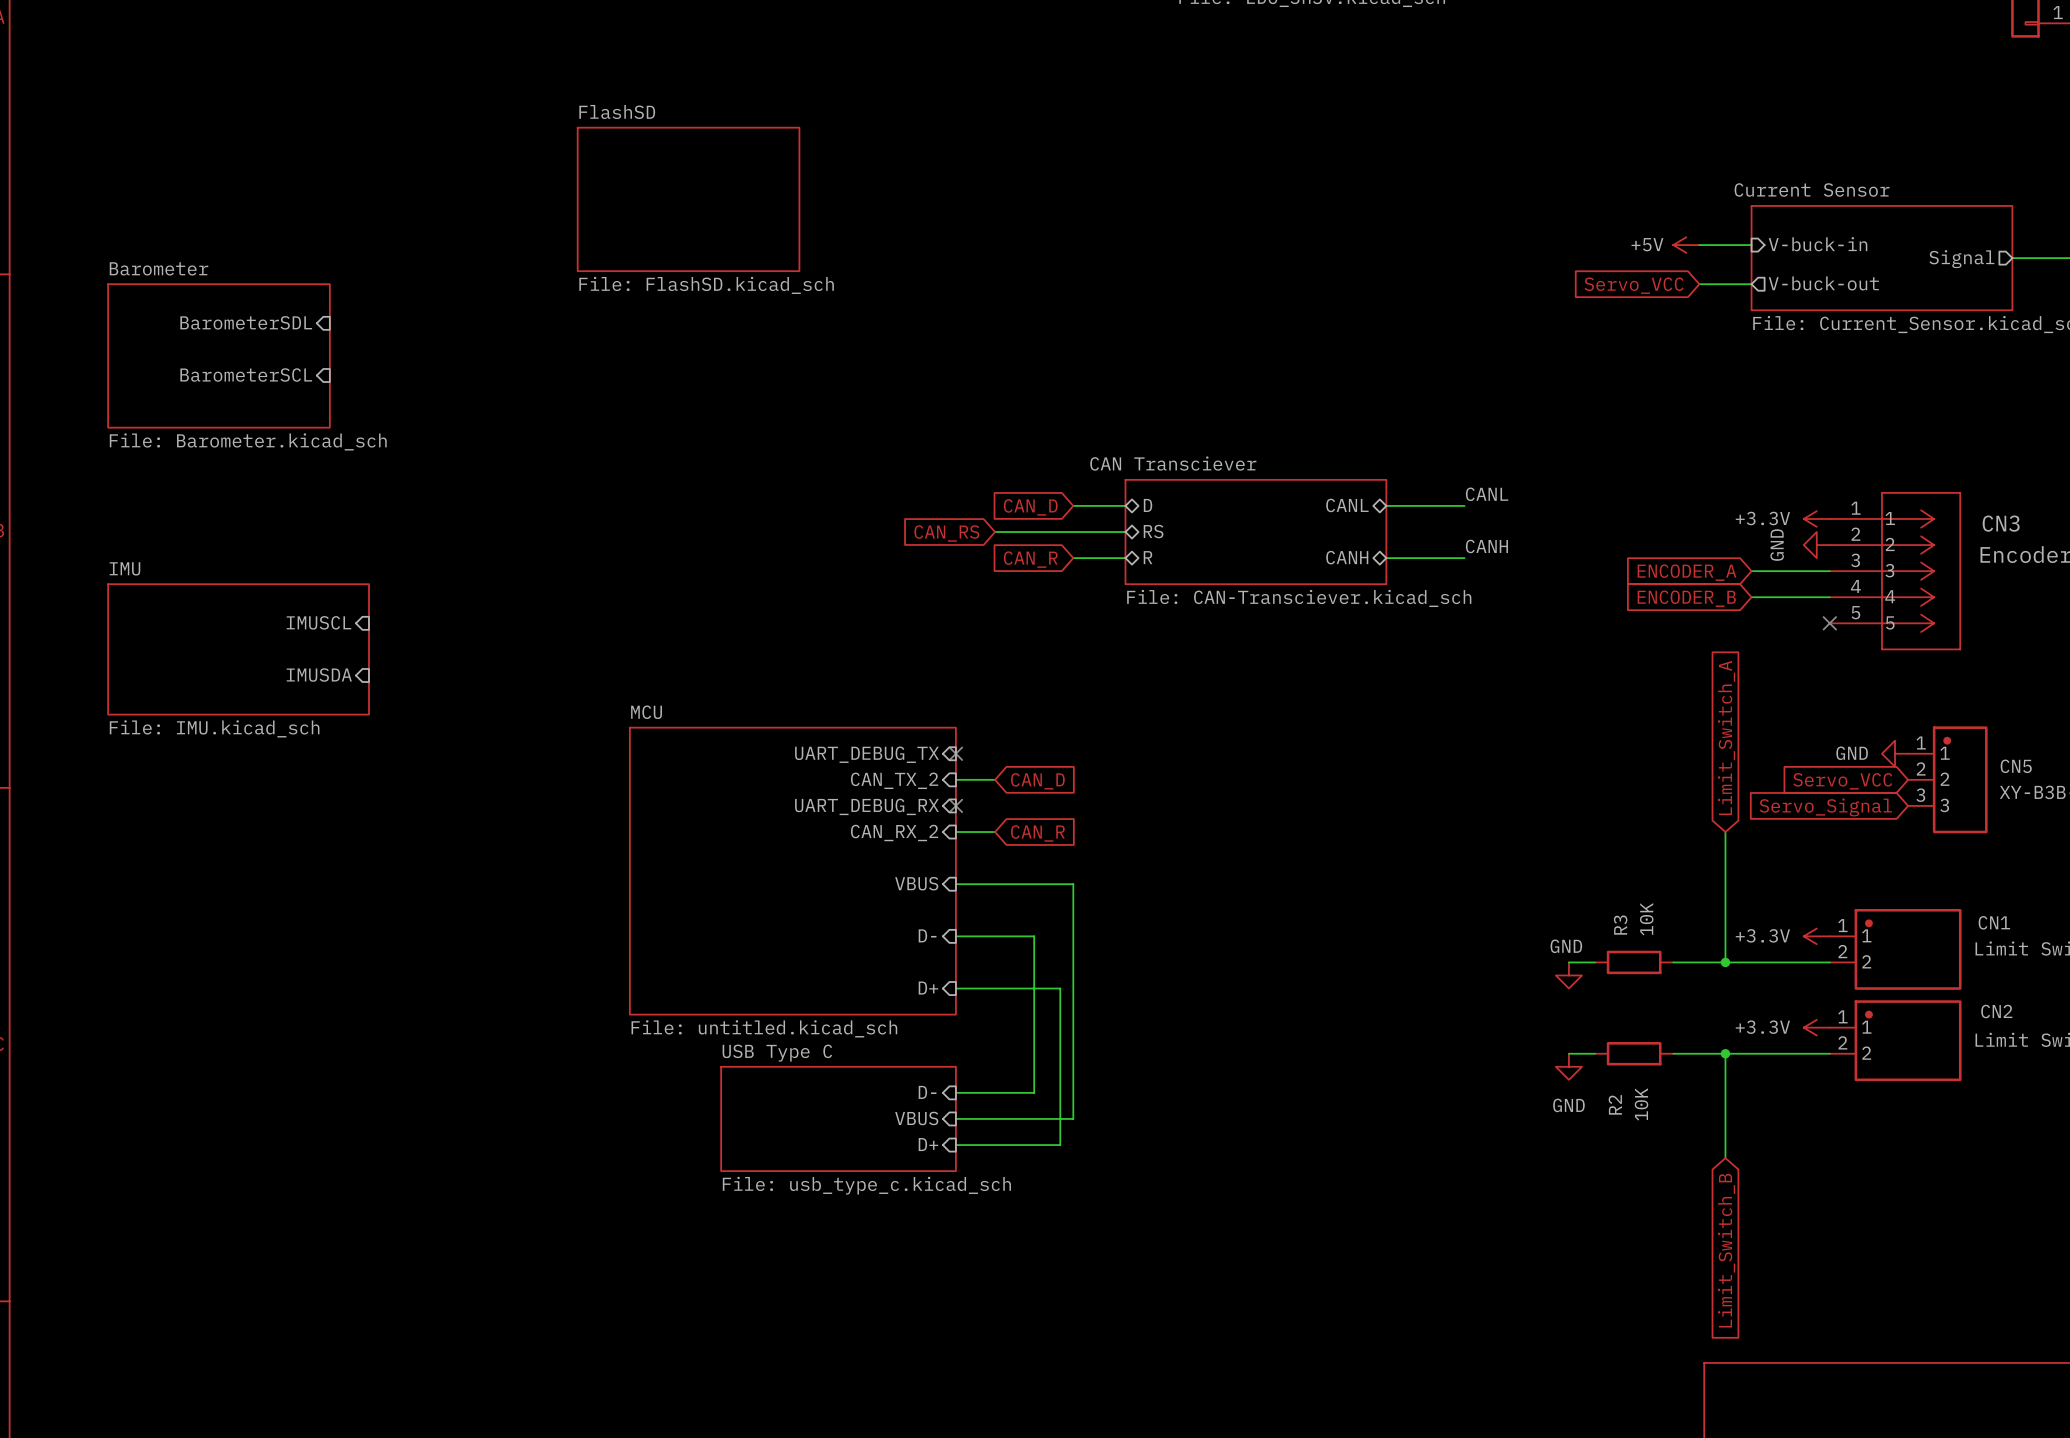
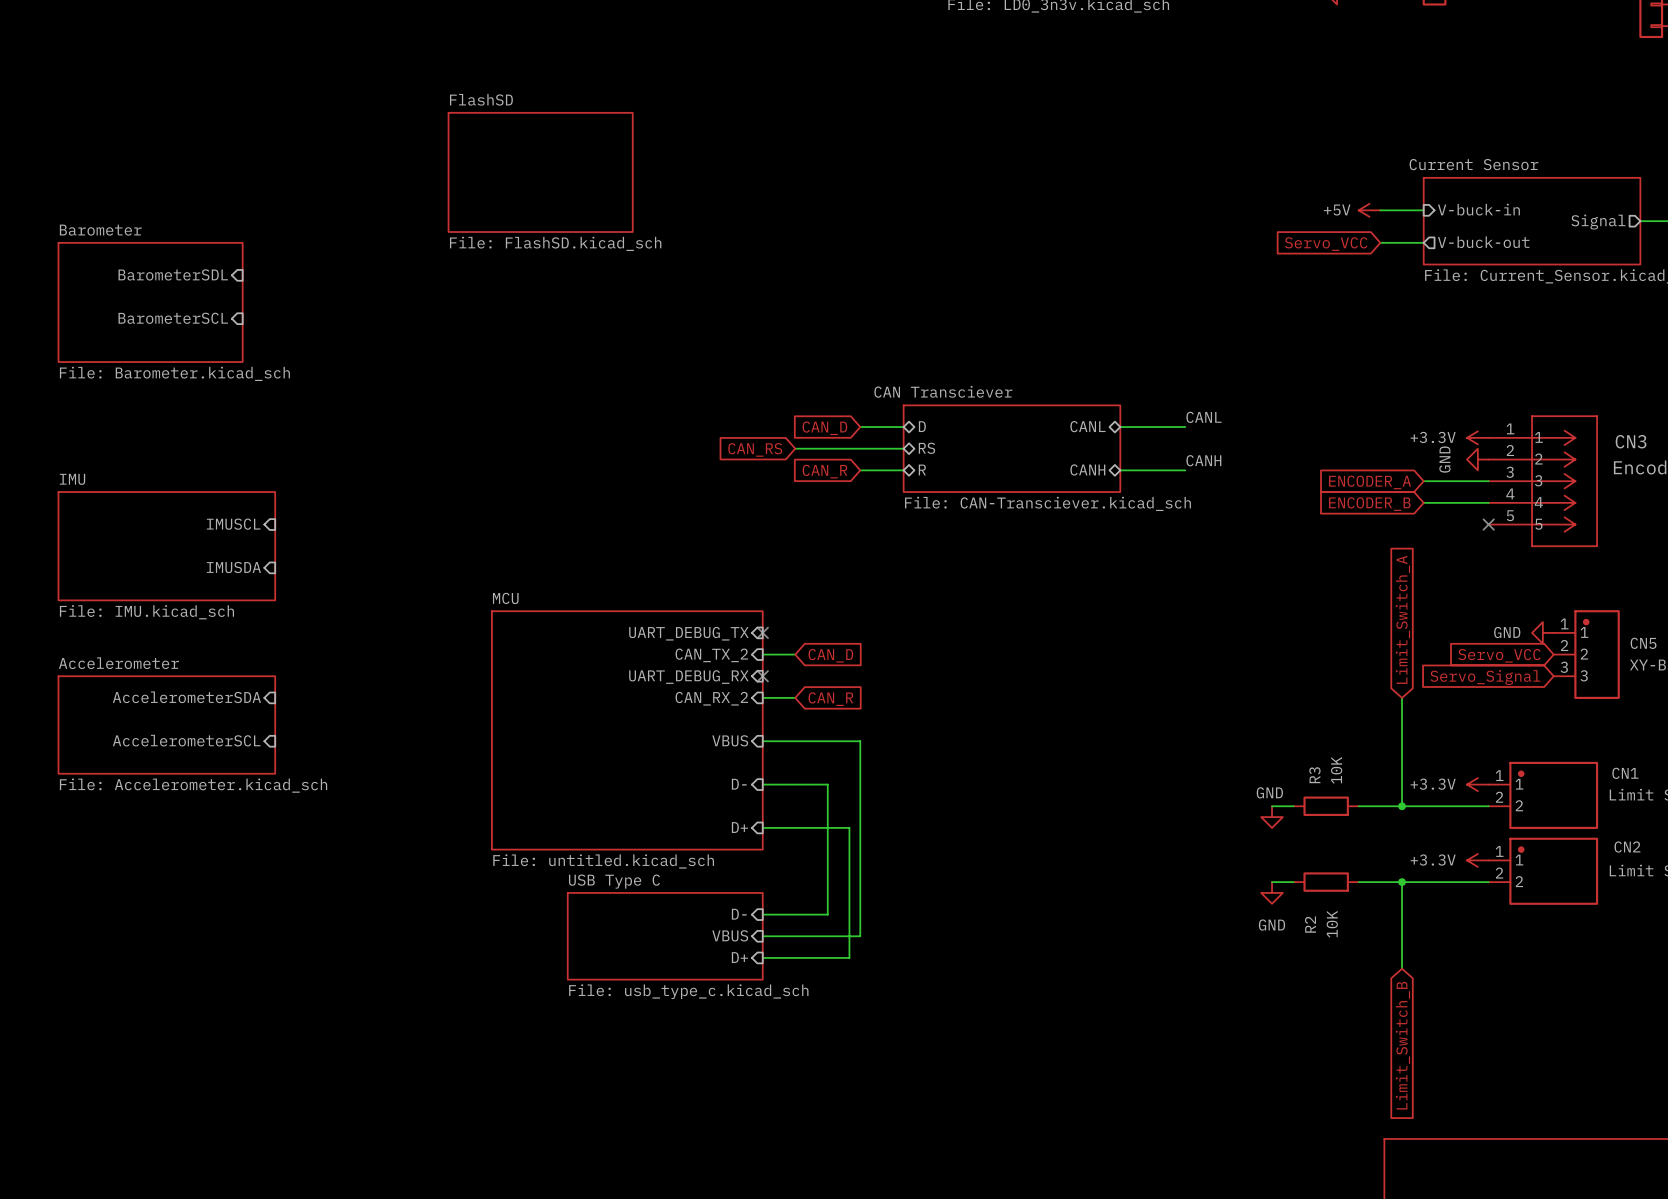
sheet pin: none -> AccelerometerSDA (186, 697)
sheet Accelerometer: none -> File: Accelerometer.kicad_sch (166, 725)
sheet pin: none -> AccelerometerSCL (186, 740)

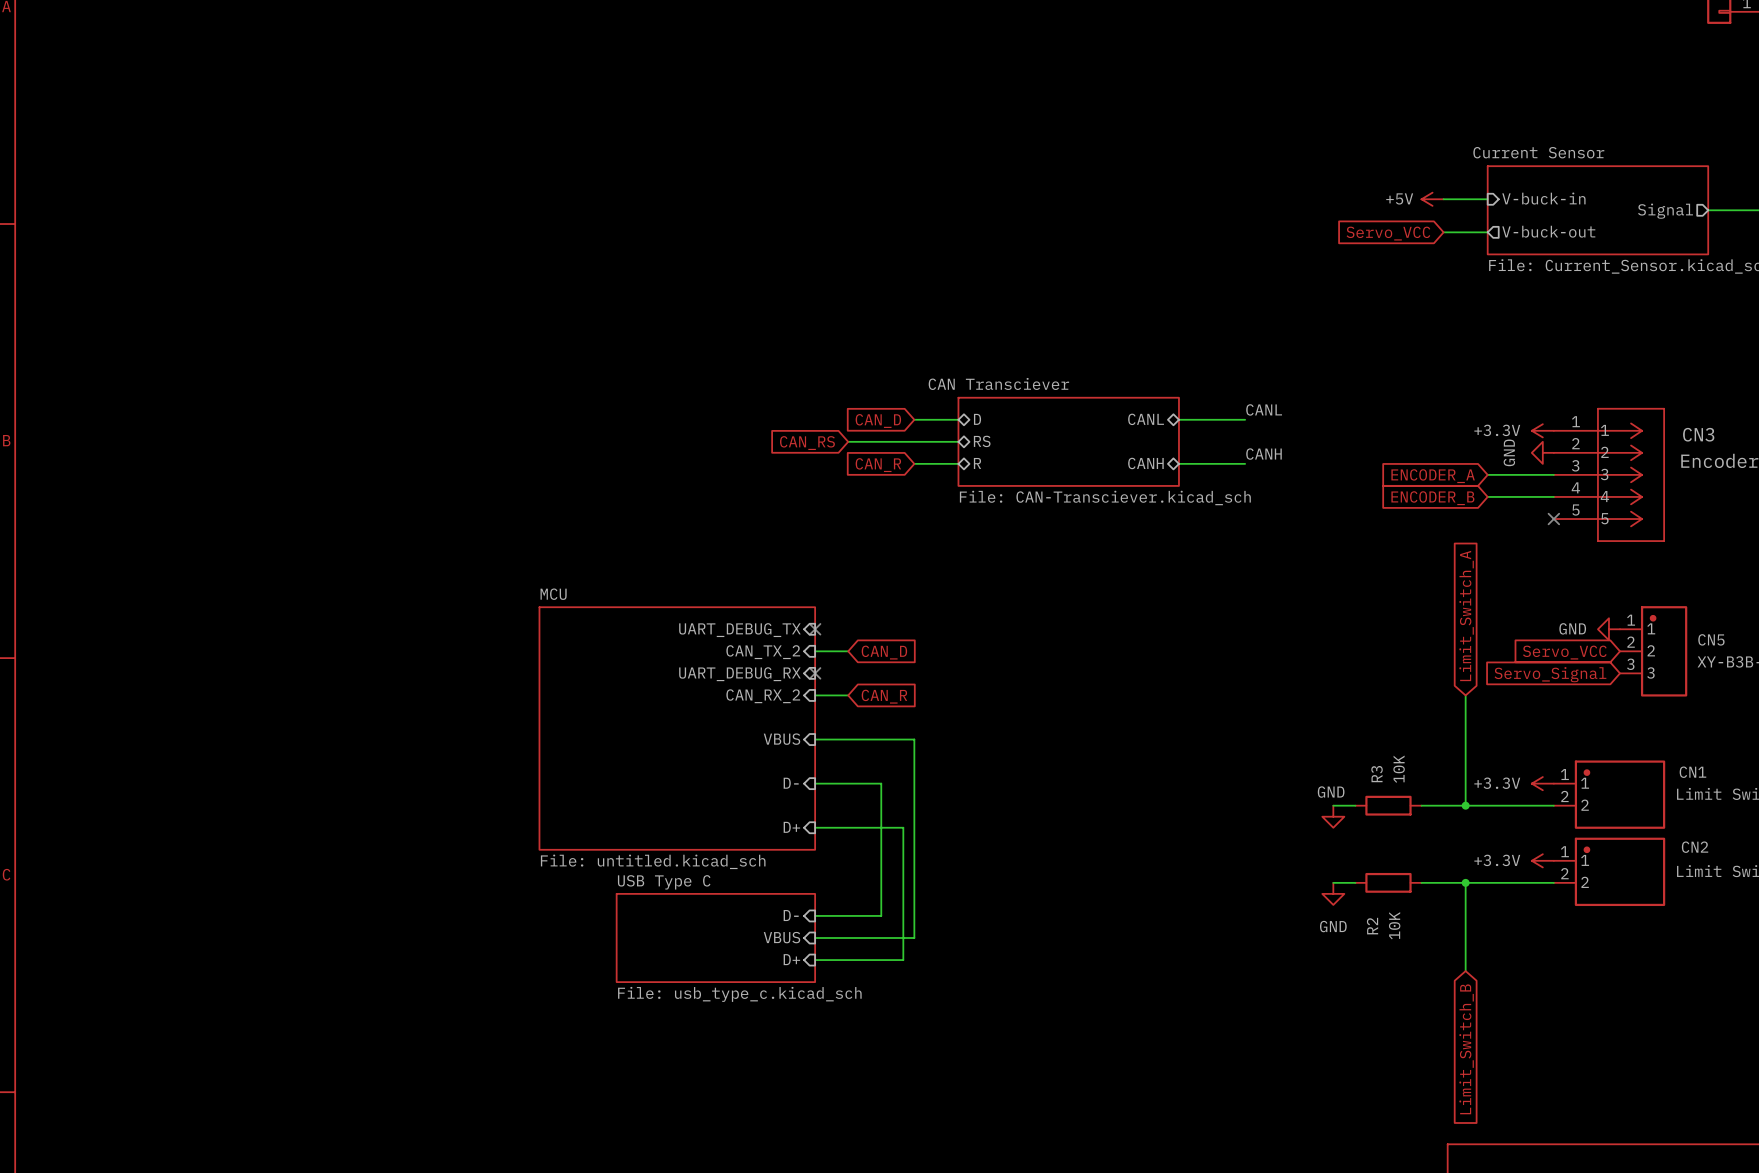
sheet FlashSD: File: FlashSD.kicad_sch (540, 172) -> none
sheet pin: BarometerSDL (173, 274) -> none
sheet Barometer: File: Barometer.kicad_sch (150, 302) -> none
sheet pin: BarometerSCL (173, 318) -> none
sheet pin: IMUSCL (233, 524) -> none
sheet IMU: File: IMU.kicad_sch (166, 546) -> none
sheet pin: IMUSDA (233, 567) -> none
sheet pin: AccelerometerSDA (186, 697) -> none
sheet Accelerometer: File: Accelerometer.kicad_sch (166, 725) -> none
sheet pin: AccelerometerSCL (186, 740) -> none

